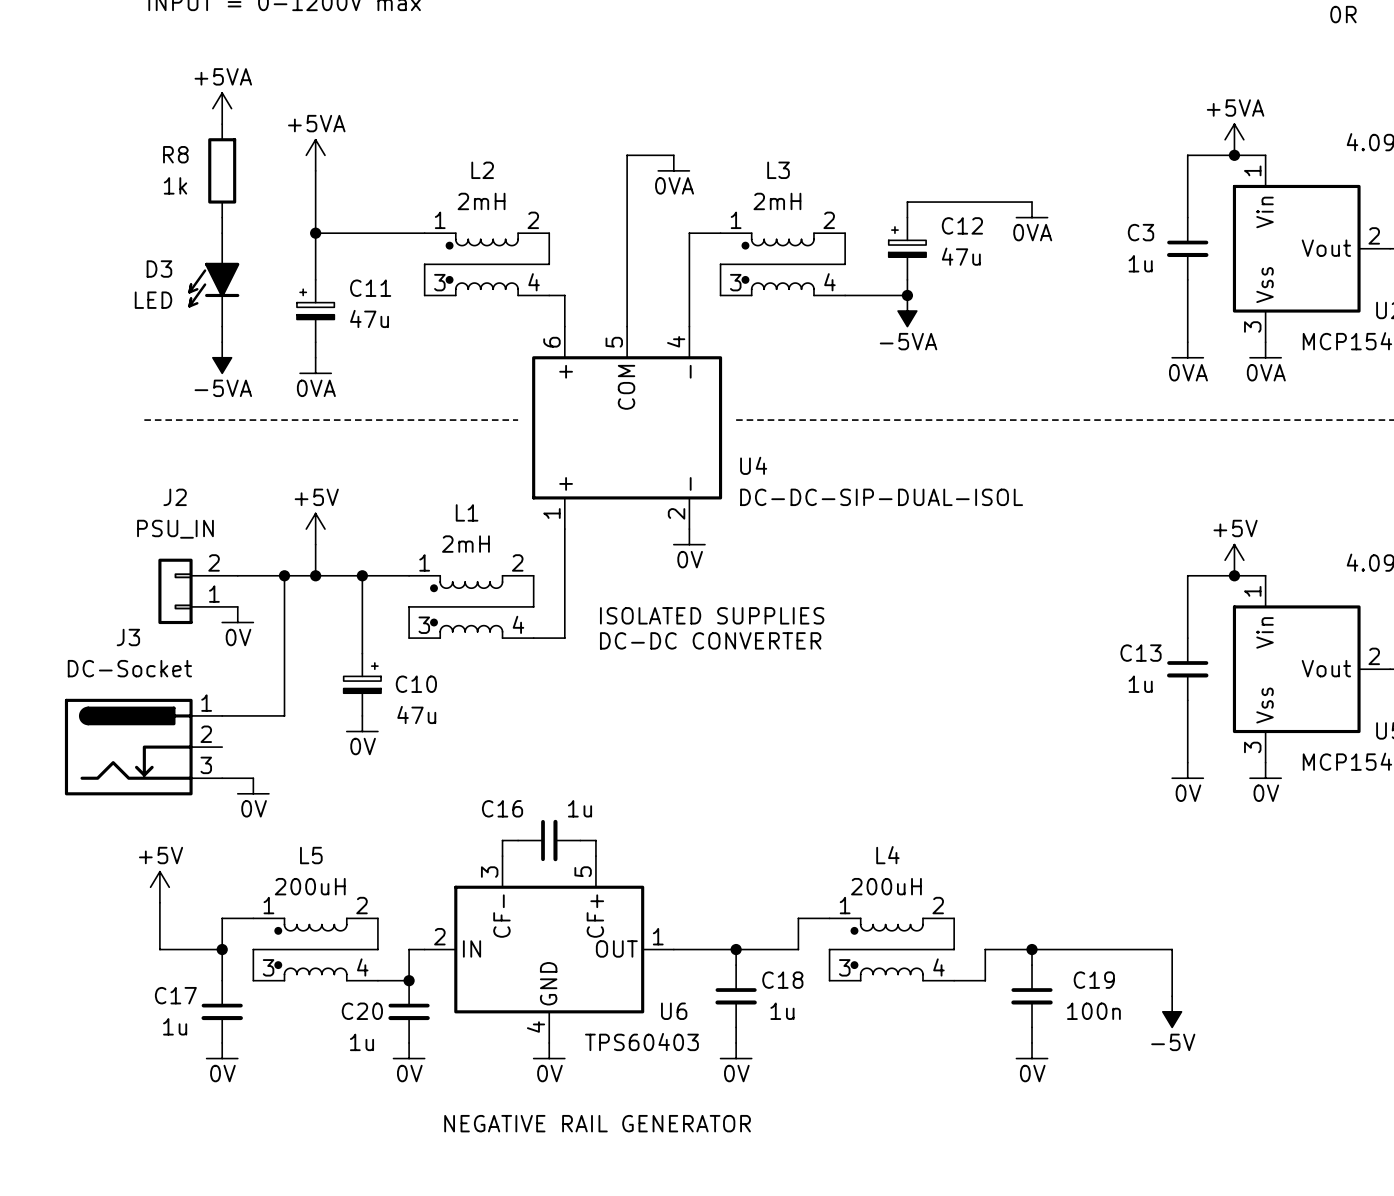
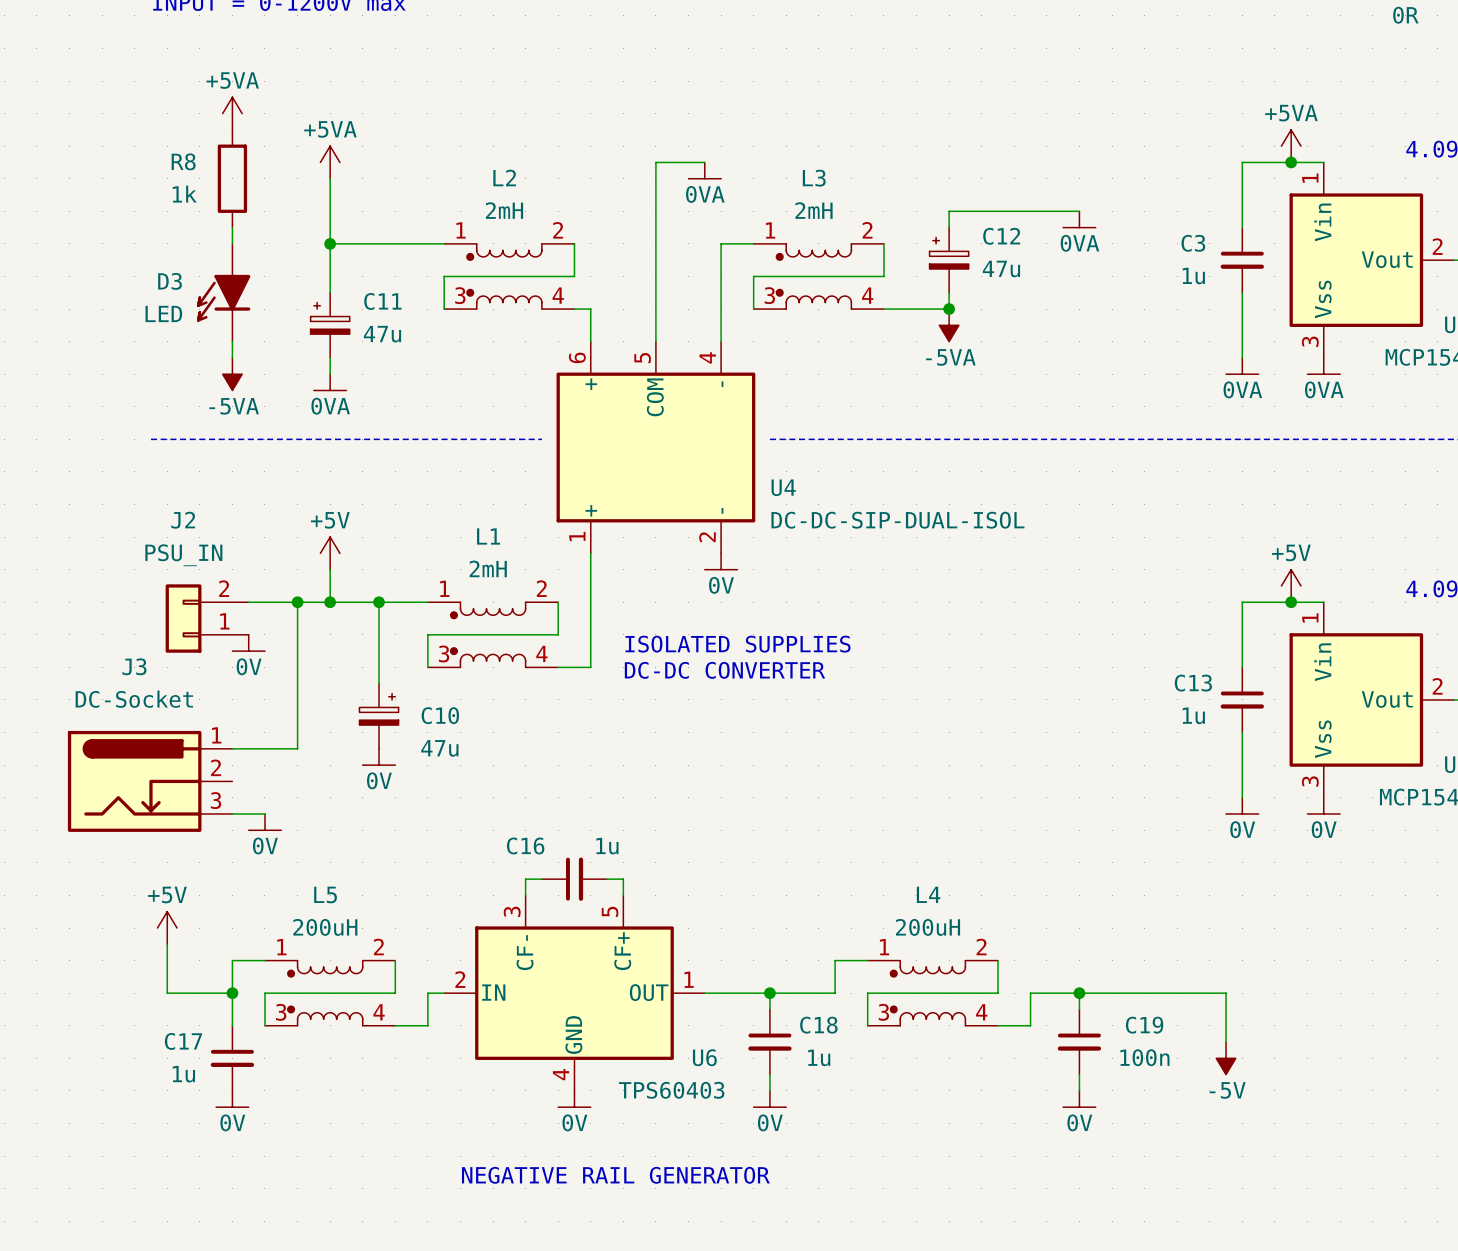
junction: (409, 980) -> none
C20: 1u (409, 1011) -> none
power symbol: 0V (409, 1050) -> none

